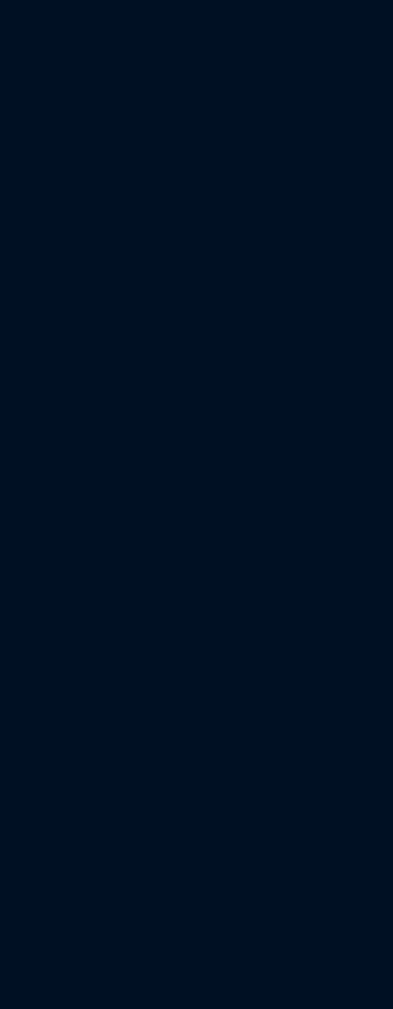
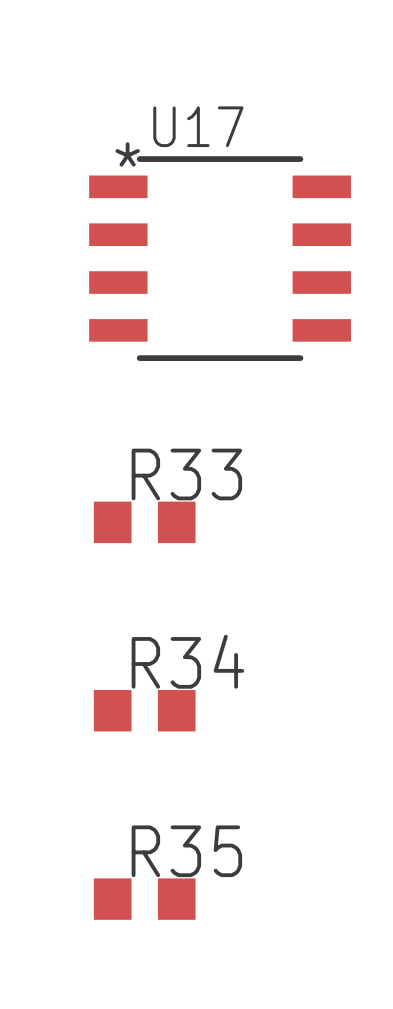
U17: none -> (220, 258)
R33: none -> (144, 522)
R34: none -> (144, 710)
R35: none -> (144, 899)

